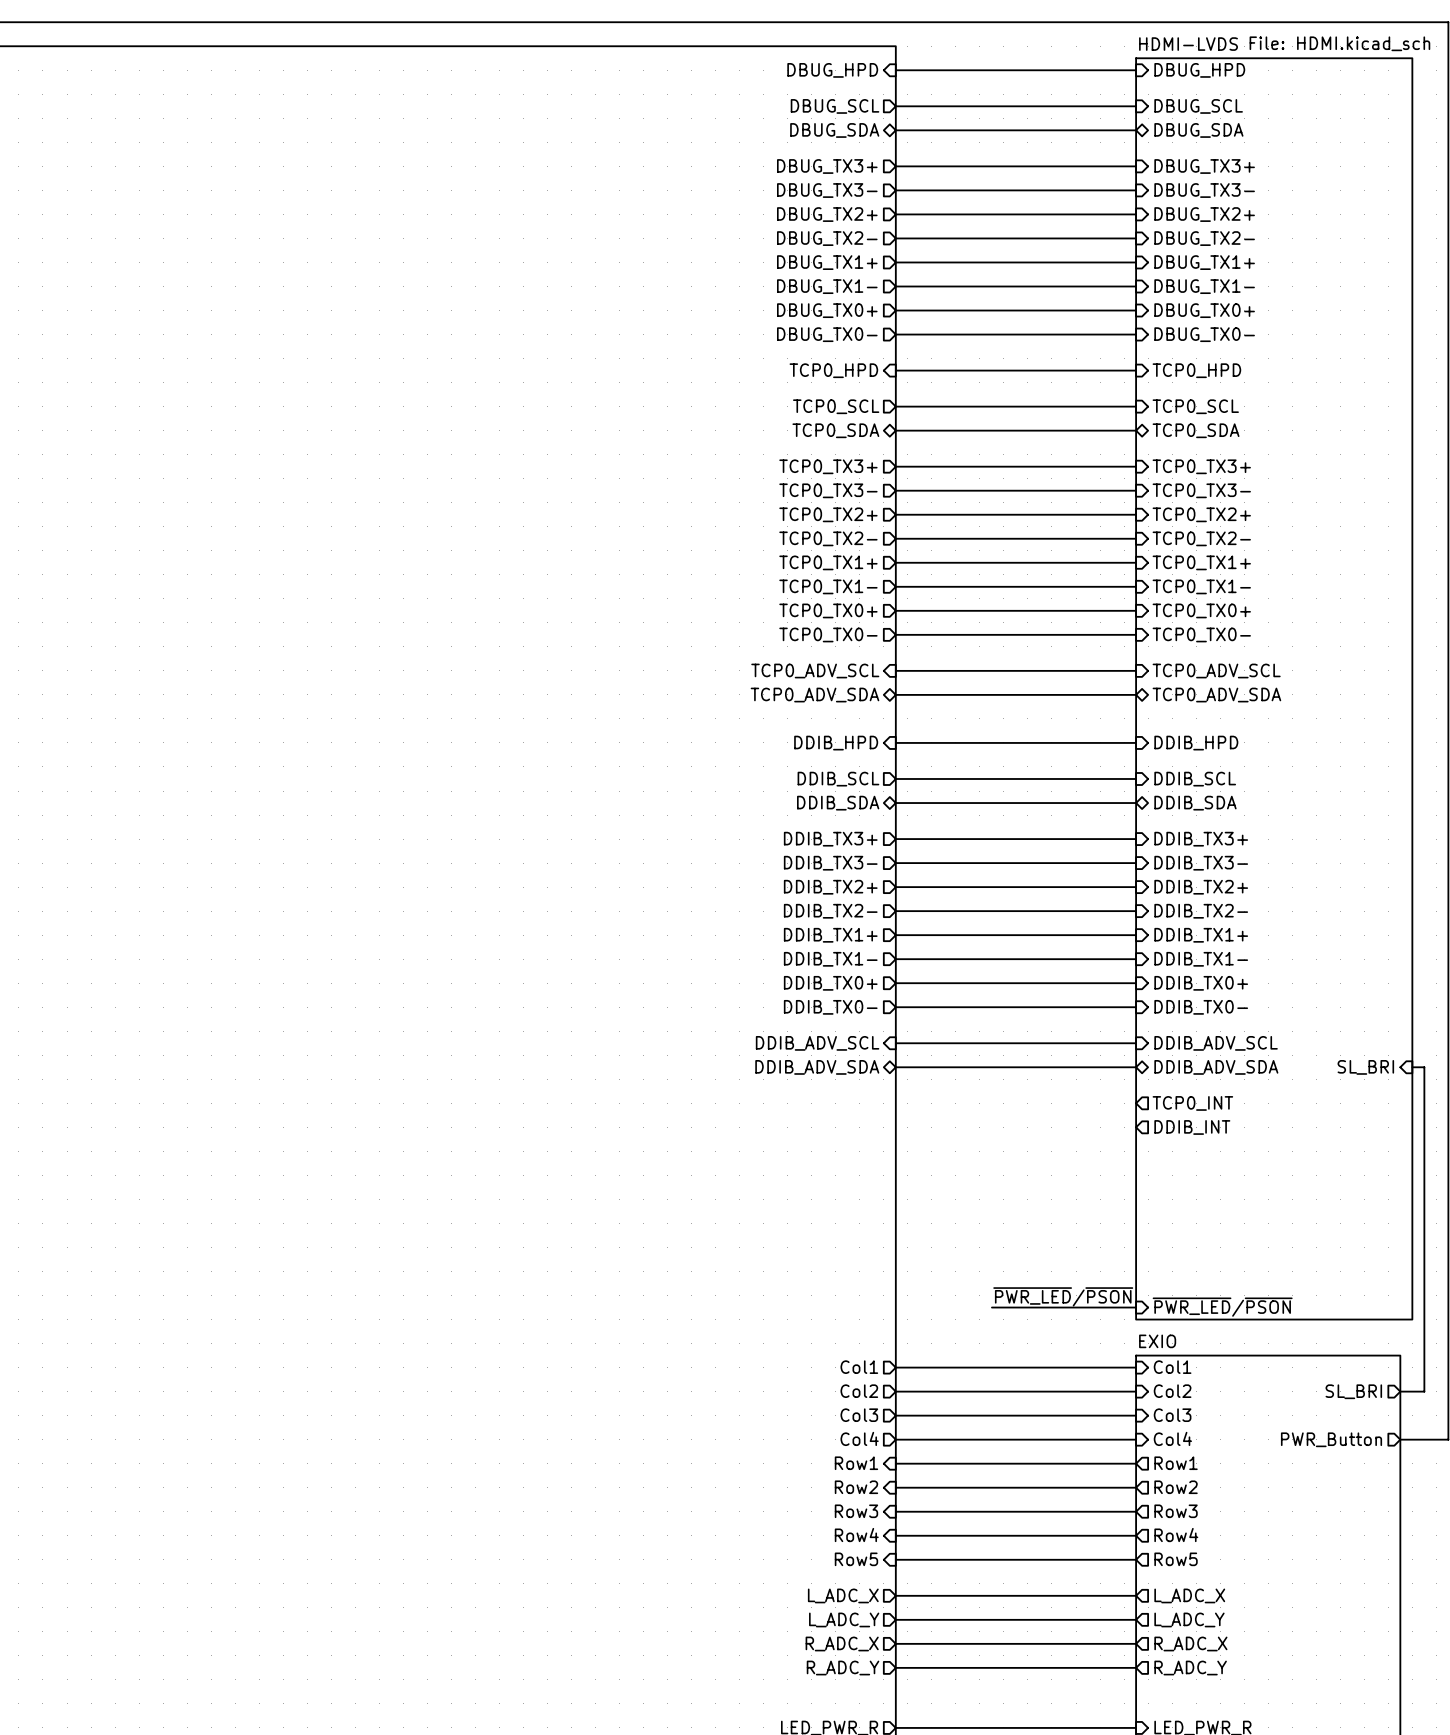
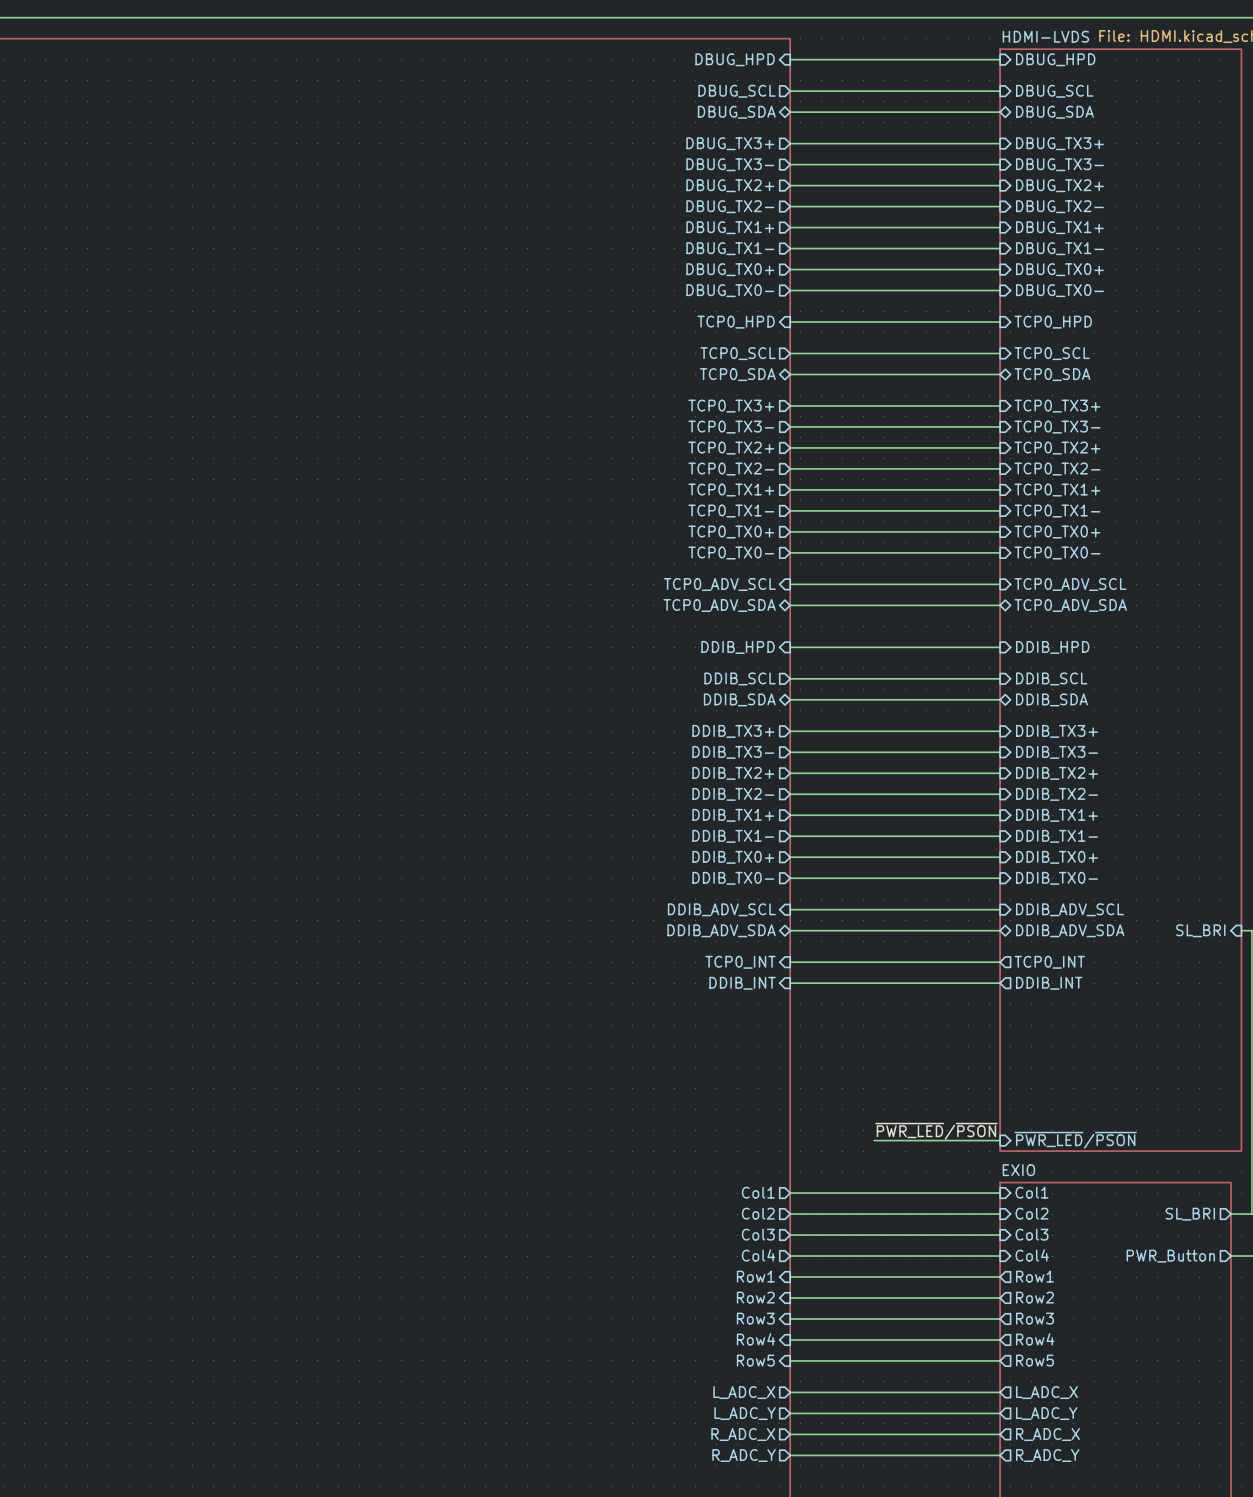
sheet pin: none -> TCP0_INT (740, 962)
wire: none -> (790, 962) (1000, 962)
sheet pin: none -> DDIB_INT (742, 983)
wire: none -> (790, 983) (1000, 983)

